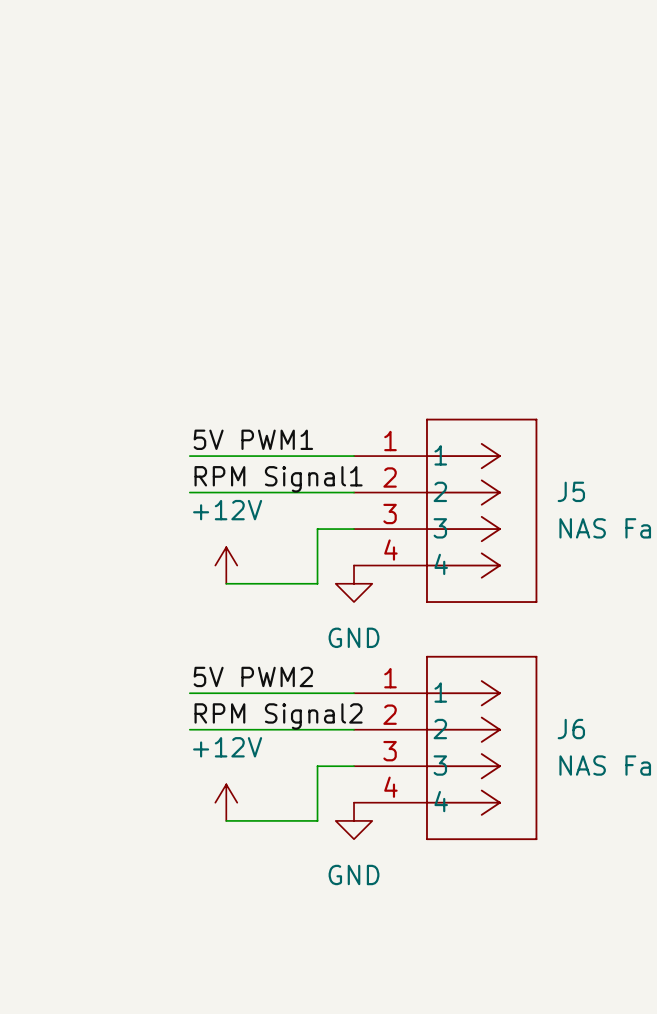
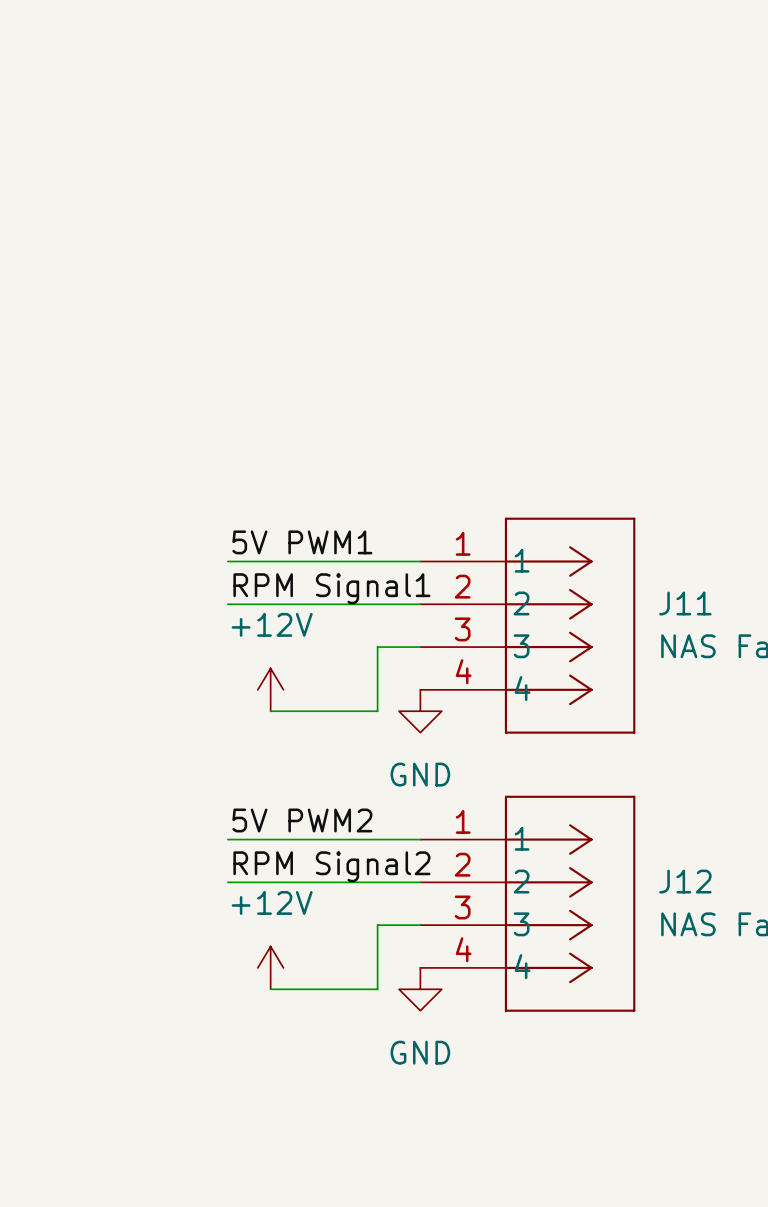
J5 name: J5 (571, 491) -> J11 (685, 603)
J6 name: J6 (571, 729) -> J12 (685, 881)

